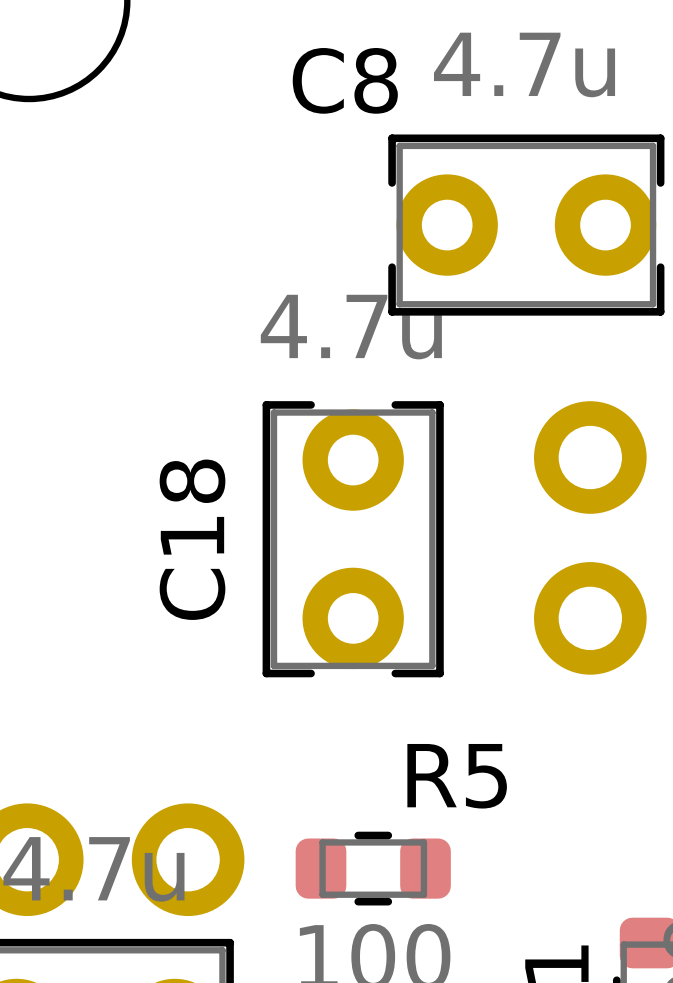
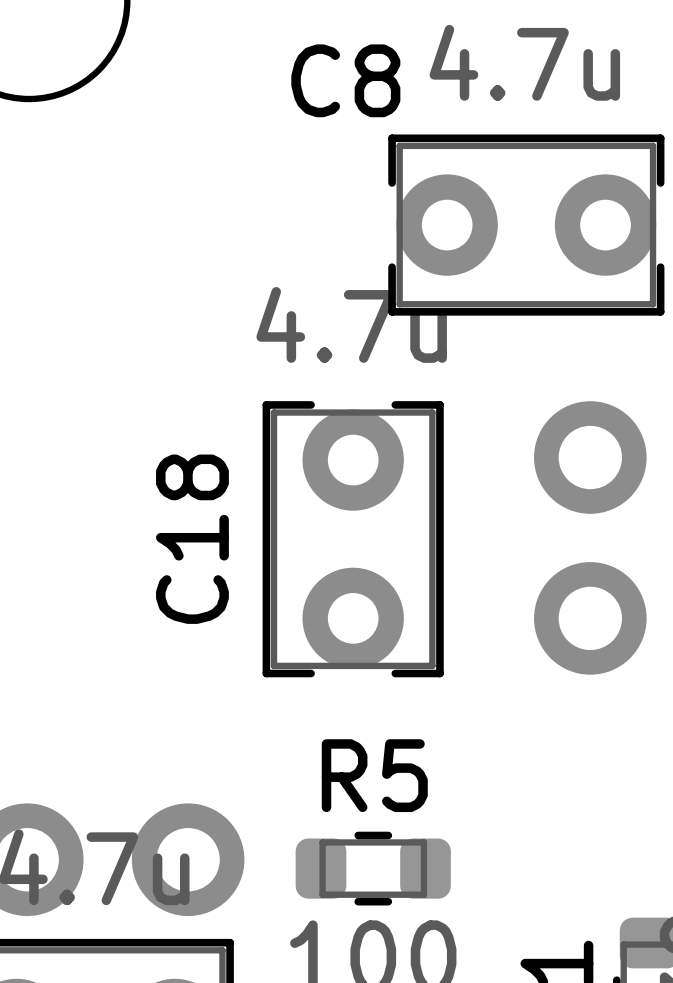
R5 name position: R5 (457, 776) -> R5 (374, 775)

